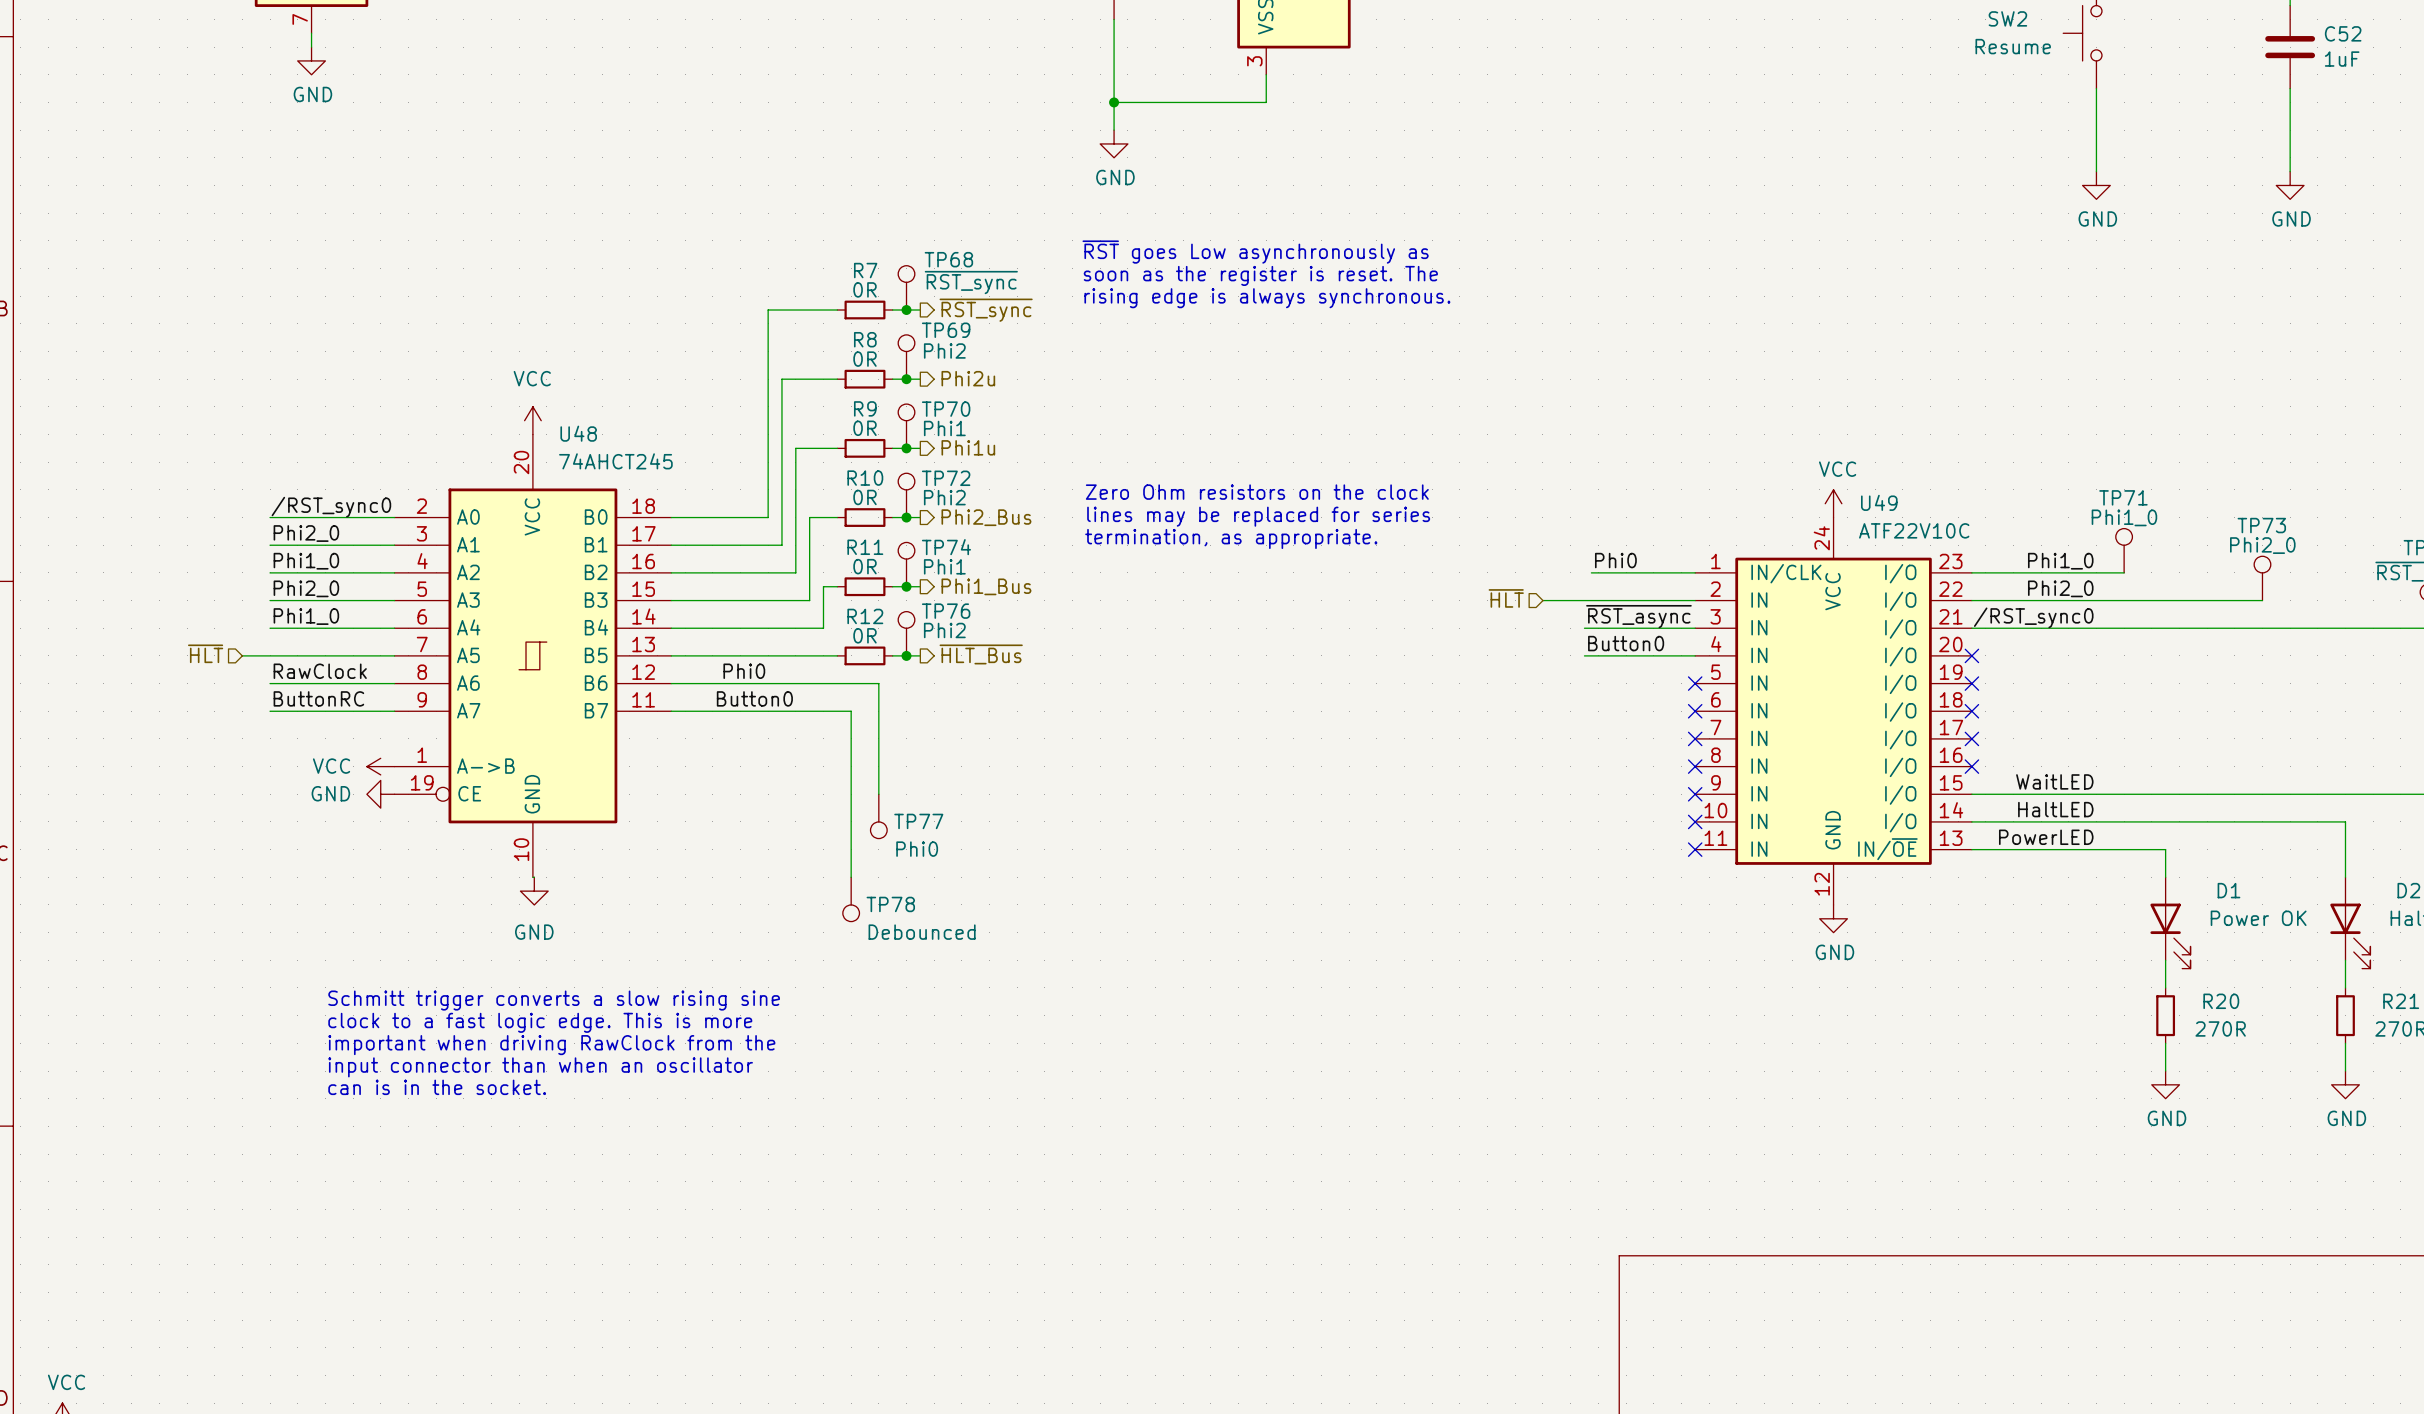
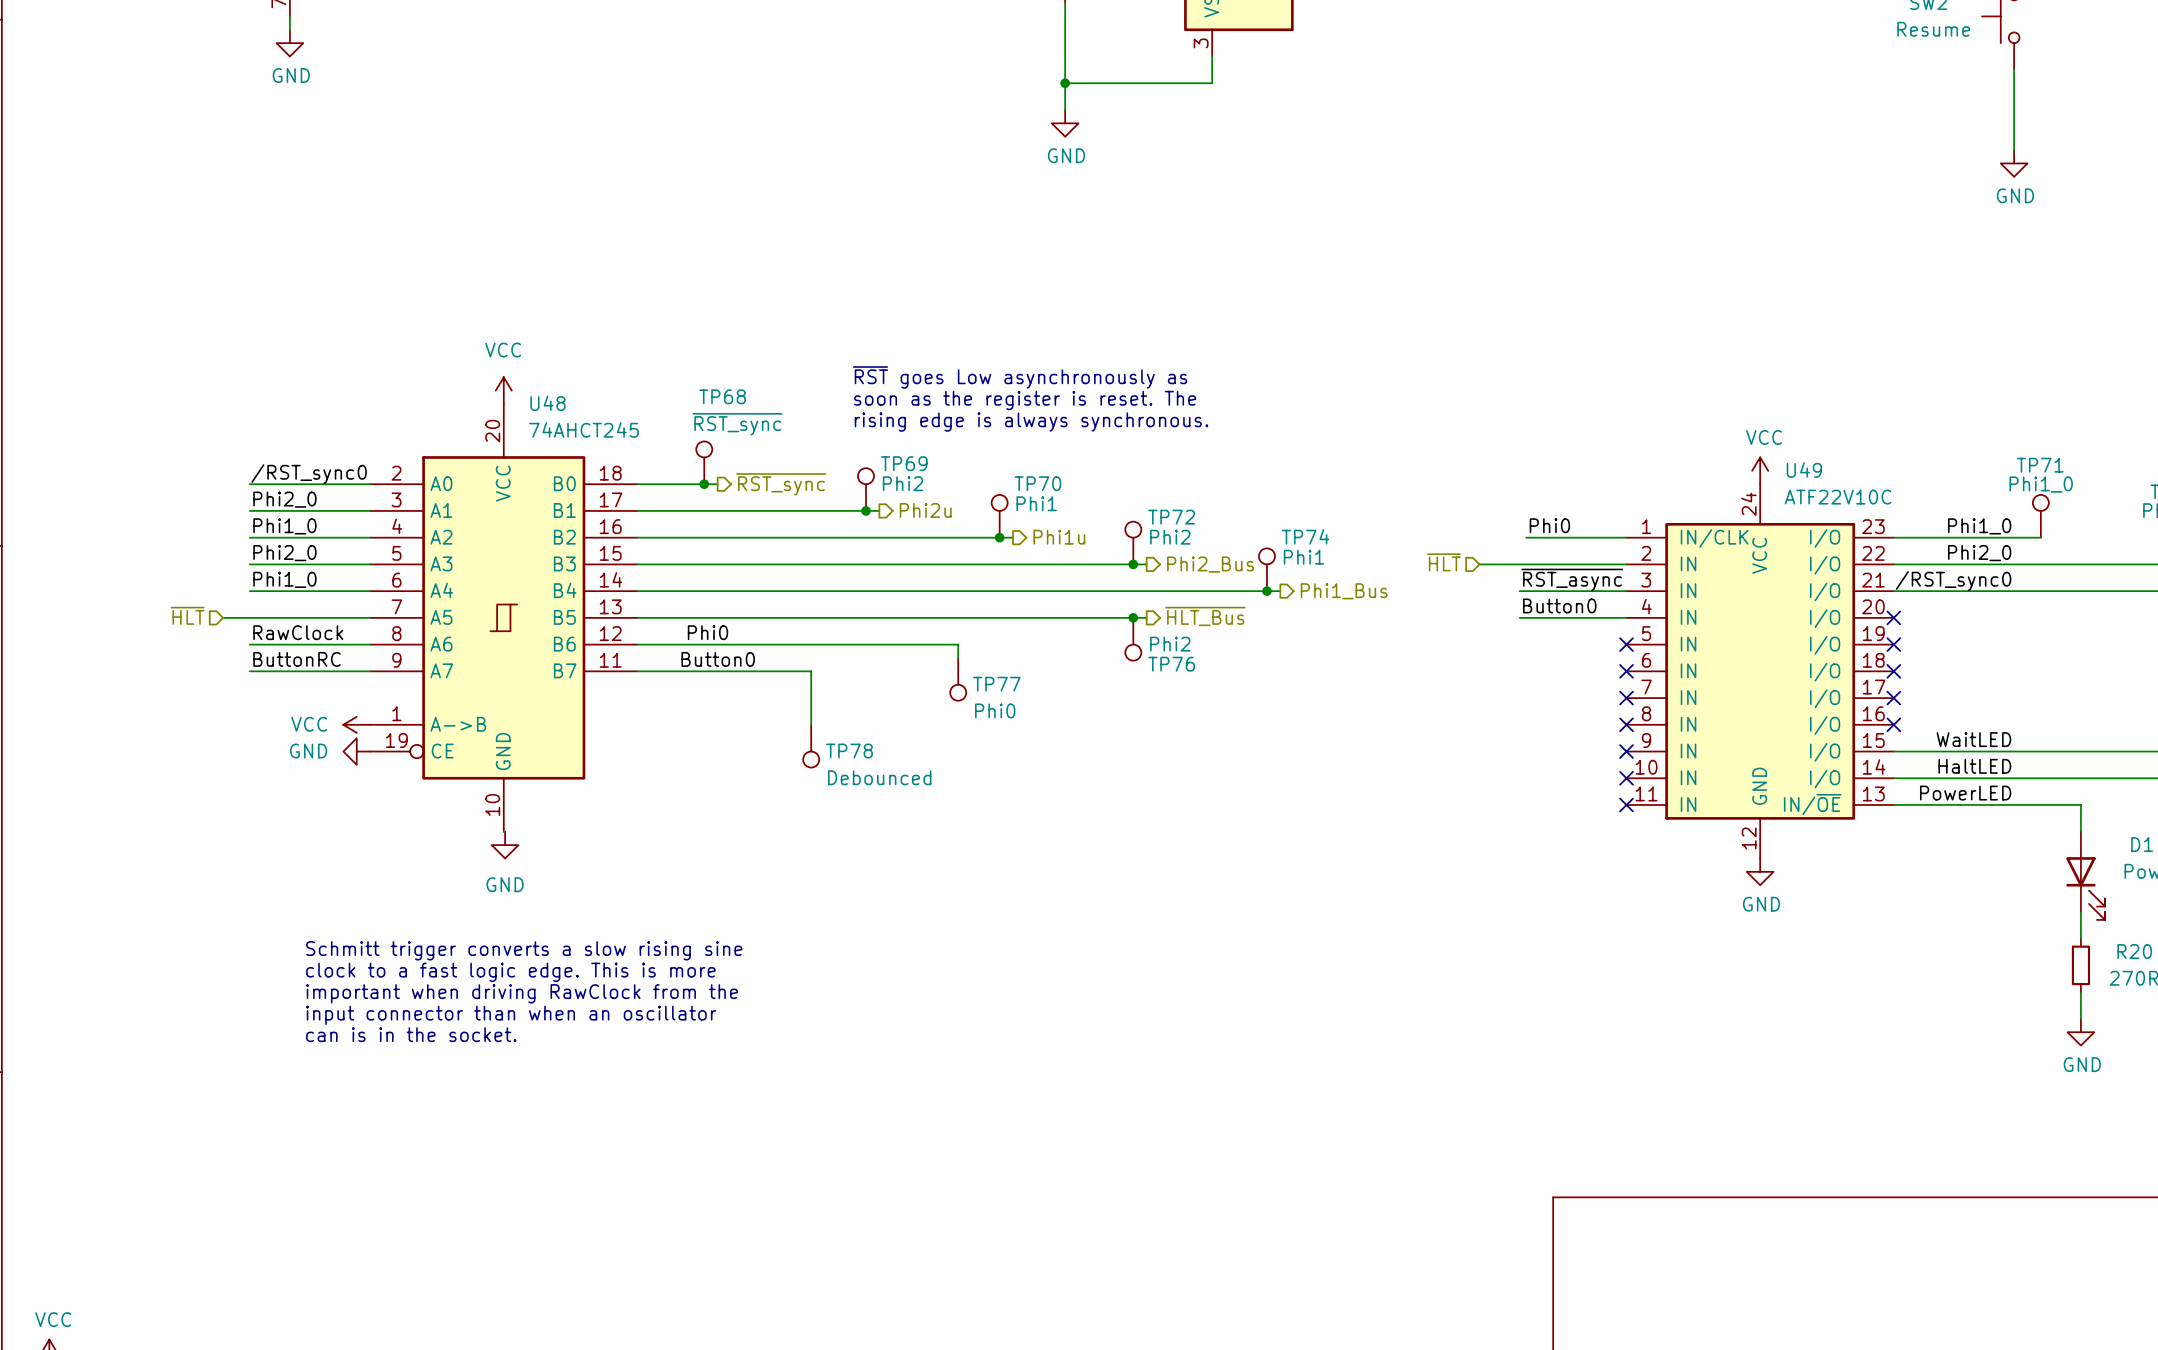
text position: ~{RST} goes Low asynchronously as (1255, 252) -> ~{RST} goes Low asynchronously as (1020, 377)
TP68 name position: TP68 (948, 259) -> TP68 (722, 396)
text position: soon as the register is reset. The (1260, 275) -> soon as the register is reset. The (1025, 400)
TP68 value position: ~{RST_sync} (971, 282) -> ~{RST_sync} (737, 424)
TP68 position: (906, 287) -> (704, 462)
text position: rising edge is always synchronous. (1267, 298) -> rising edge is always synchronous. (1031, 422)
wire: (837, 310) (768, 310) (768, 517) (754, 517) -> none
R7: 0R (865, 310) -> none
wire: (892, 310) (920, 310) -> none
junction: (906, 310) -> none
hierarchical label position: ~{RST_sync} (986, 310) -> ~{RST_sync} (781, 484)
TP69 position: (906, 357) -> (865, 489)
hierarchical label position: Phi2u (968, 378) -> Phi2u (925, 510)
wire: (837, 379) (781, 379) (781, 545) -> (879, 510) (744, 510)
R8: 0R (865, 379) -> none
wire: (892, 379) (920, 379) -> none
junction: (906, 379) -> none
TP70 name position: TP70 (946, 409) -> TP70 (1037, 483)
TP70 position: (906, 426) -> (999, 516)
TP70 value position: Phi1 (944, 428) -> Phi1 (1036, 503)
hierarchical label position: Phi1u (968, 447) -> Phi1u (1059, 537)
wire: (837, 448) (795, 448) (795, 572) -> (1013, 537) (757, 537)
R9: 0R (865, 448) -> none
wire: (892, 448) (920, 448) -> none
junction: (906, 448) -> none
TP72 name position: TP72 (946, 478) -> TP72 (1171, 517)
text: Zero Ohm resistors on the clock (1257, 492) -> none
TP72 position: (906, 495) -> (1133, 543)
TP72 value position: Phi2 (944, 497) -> Phi2 (1170, 537)
text: lines may be replaced for series (1258, 516) -> none
junction: none -> (704, 484)
wire: (837, 517) (809, 517) (809, 600) -> (1146, 564) (771, 564)
R10: 0R (865, 517) -> none
wire: (892, 517) (920, 517) -> none
junction: (906, 517) -> none
hierarchical label: Phi2_Bus (986, 517) -> none
text: termination, as appropriate. (1231, 538) -> none
junction: none -> (865, 510)
TP74 name position: TP74 (946, 547) -> TP74 (1305, 536)
TP74 position: (906, 564) -> (1266, 569)
TP74 value position: Phi1 (944, 566) -> Phi1 (1303, 557)
junction: none -> (999, 537)
wire: (837, 586) (823, 586) (823, 628) -> (1280, 591) (784, 591)
R11: 0R (865, 586) -> none
wire: (892, 586) (920, 586) -> none
junction: (906, 586) -> none
hierarchical label: Phi1_Bus (986, 586) -> none
junction: none -> (1133, 564)
hierarchical label: none -> Phi2_Bus (1210, 564)
TP76 name position: TP76 (946, 611) -> TP76 (1171, 664)
TP76 rotation: 0° (906, 619) -> 180° (1133, 652)
junction: none -> (1266, 591)
hierarchical label: none -> Phi1_Bus (1344, 591)
TP76 position: (906, 633) -> (1133, 639)
hierarchical label: ~{HLT_Bus} (981, 654) -> none
hierarchical label: none -> ~{HLT_Bus} (1205, 616)
wire: none -> (797, 617) (851, 617)
R12: 0R (865, 655) -> none
junction: (906, 655) -> none
wire: none -> (878, 617) (1146, 617)
junction: none -> (1133, 617)
wire: (878, 683) (878, 794) -> (837, 644) (958, 644) (958, 657)
wire: (851, 766) (851, 877) -> none
TP77 position: (878, 816) -> (958, 679)
TP78 position: (851, 899) -> (811, 746)

